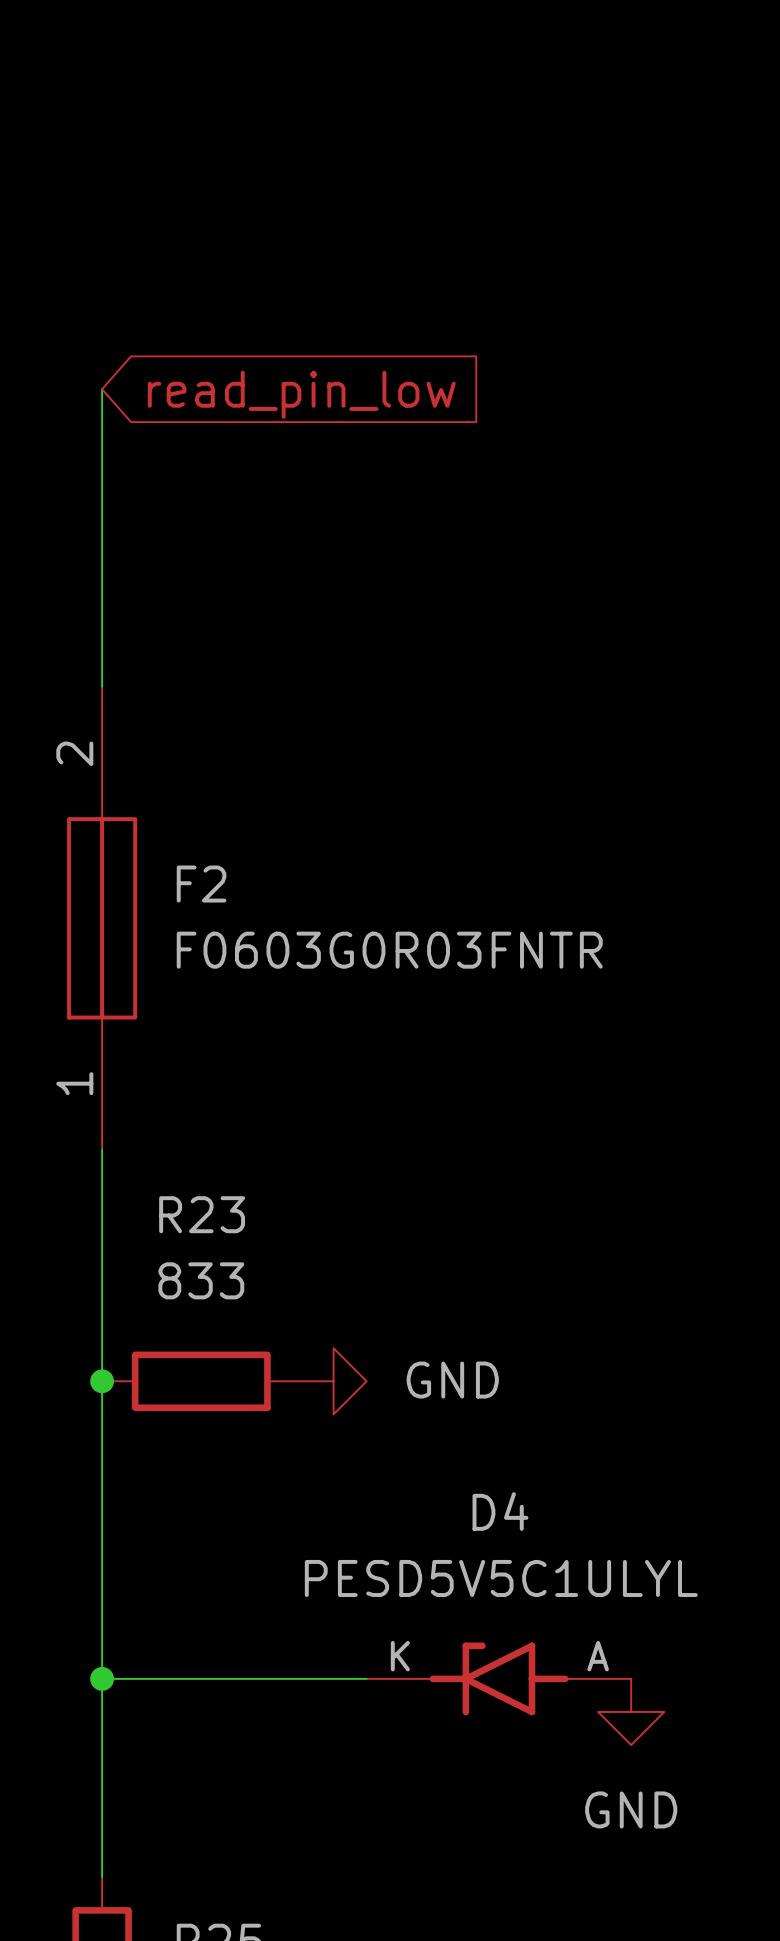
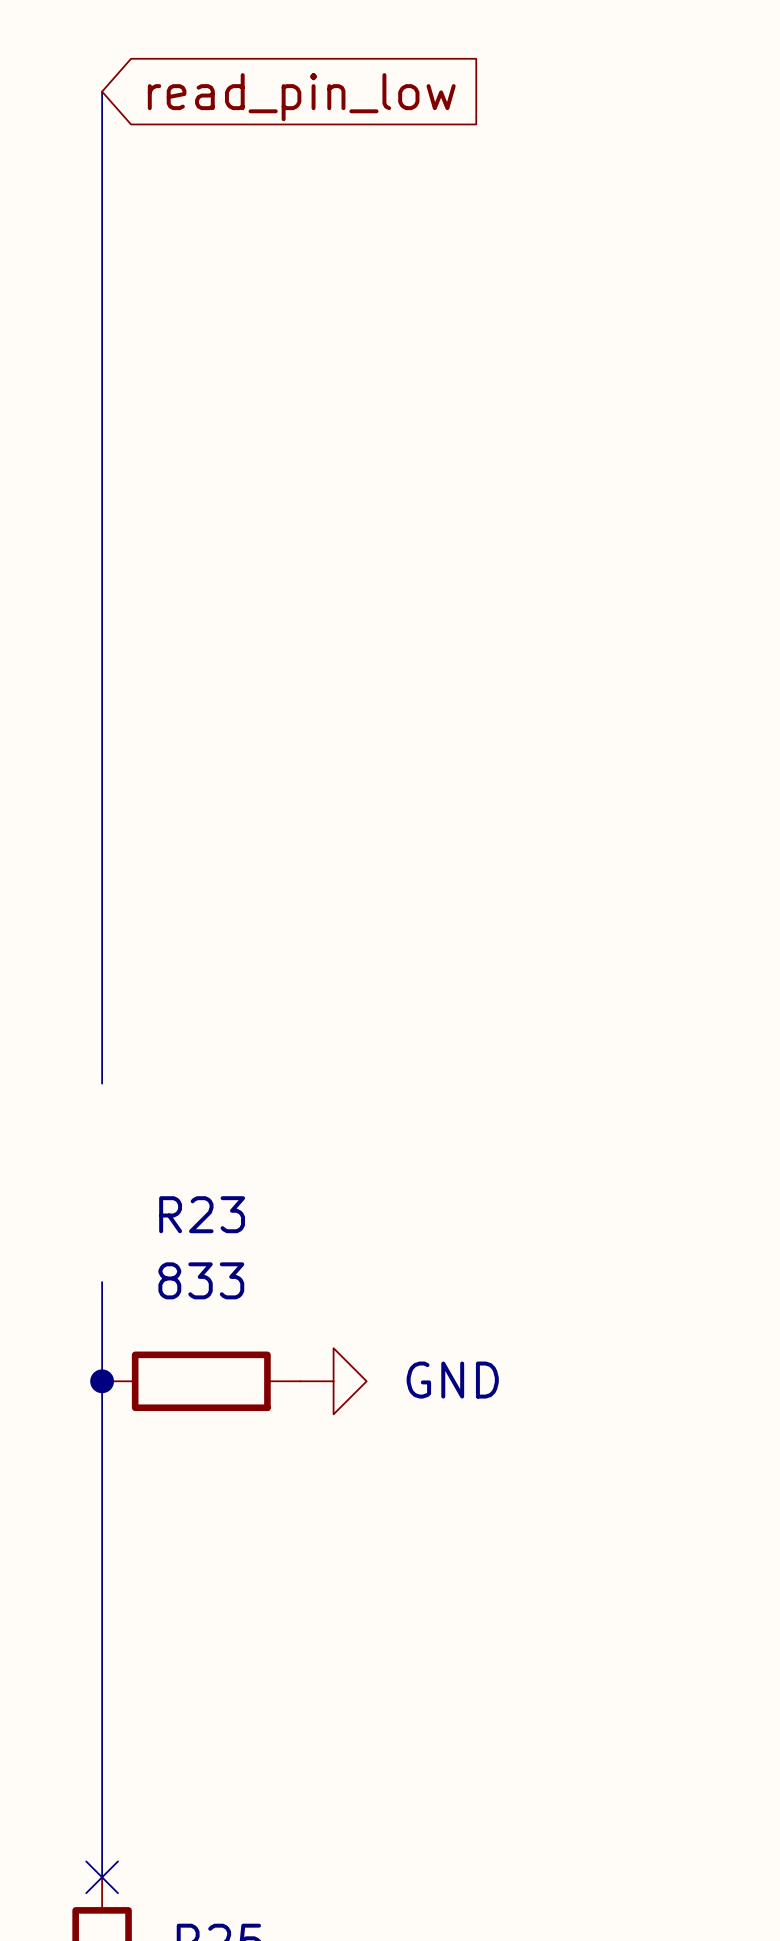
wire: none -> (102, 91) (102, 389)
global label position: read_pin_low (301, 394) -> read_pin_low (301, 97)
F2: F0603G0R03FNTR (102, 918) -> none
wire: (102, 1149) (102, 1282) -> none
wire: (102, 1678) (366, 1678) -> none
junction: (102, 1678) -> none
D4: PESD5V5C1ULYL (498, 1678) -> none
power symbol: GND (631, 1711) -> none
no-connect mark: none -> (102, 1877)

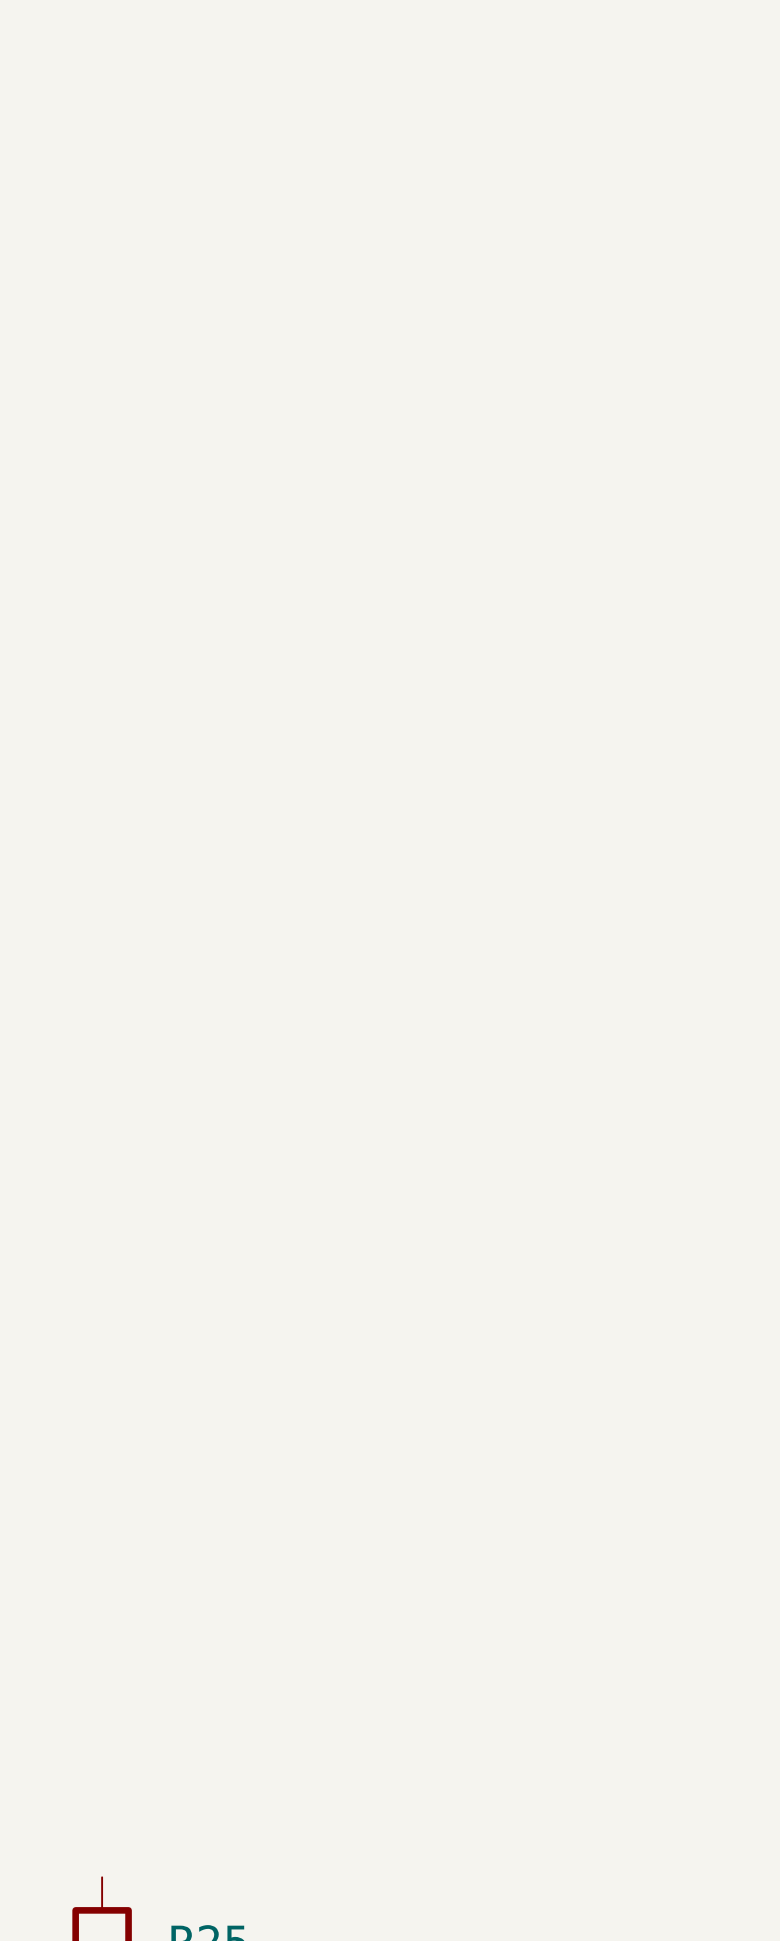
wire: (102, 91) (102, 1083) -> none
global label: read_pin_low (301, 97) -> none
wire: (102, 1282) (102, 1877) -> none
junction: (102, 1381) -> none
R23: 833 (201, 1381) -> none
power symbol: GND (333, 1381) -> none
no-connect mark: (102, 1877) -> none

